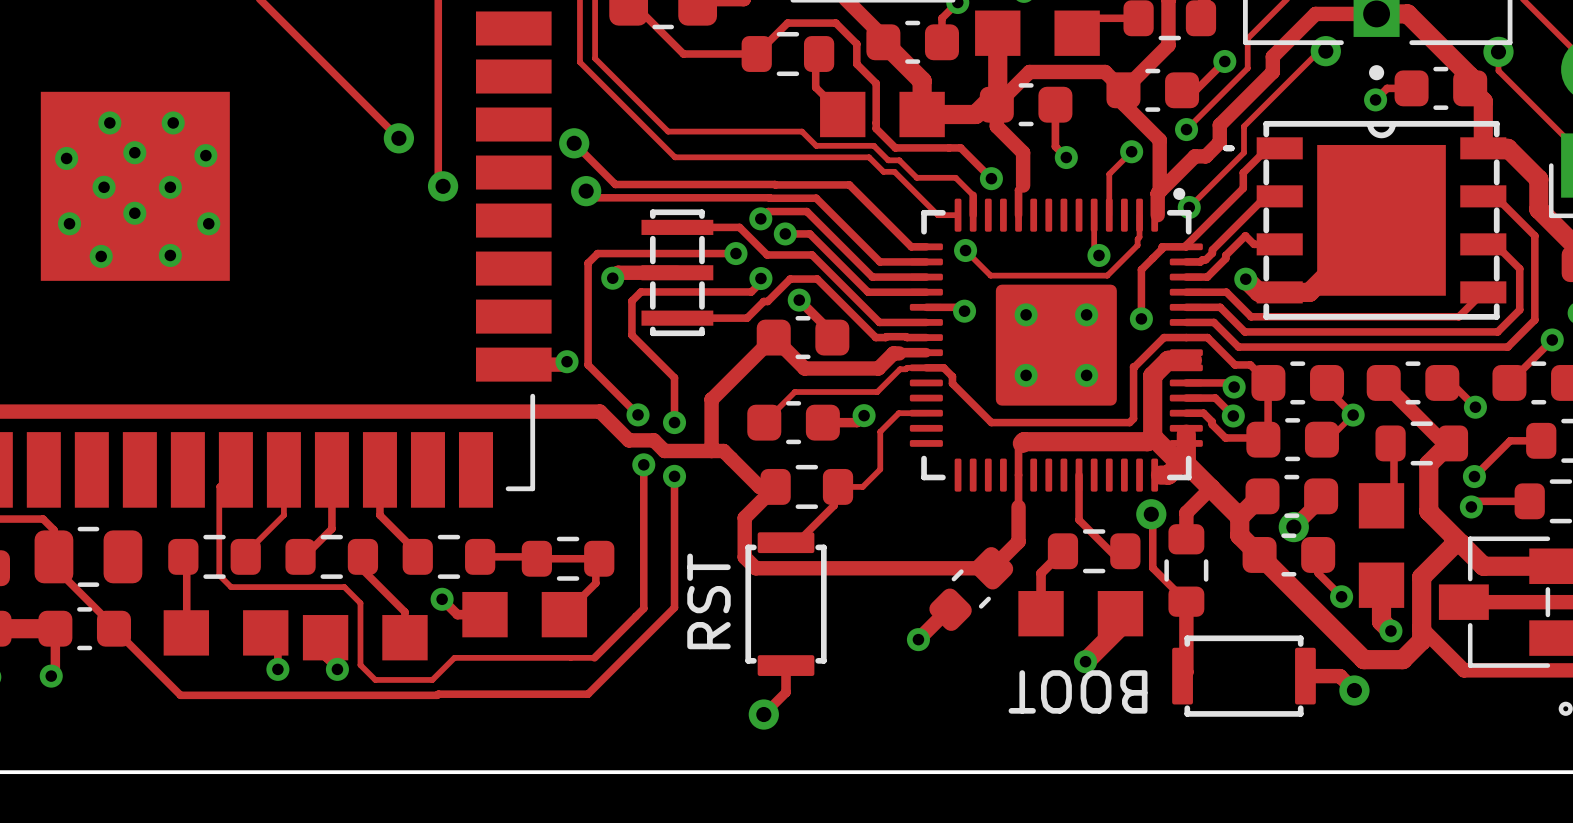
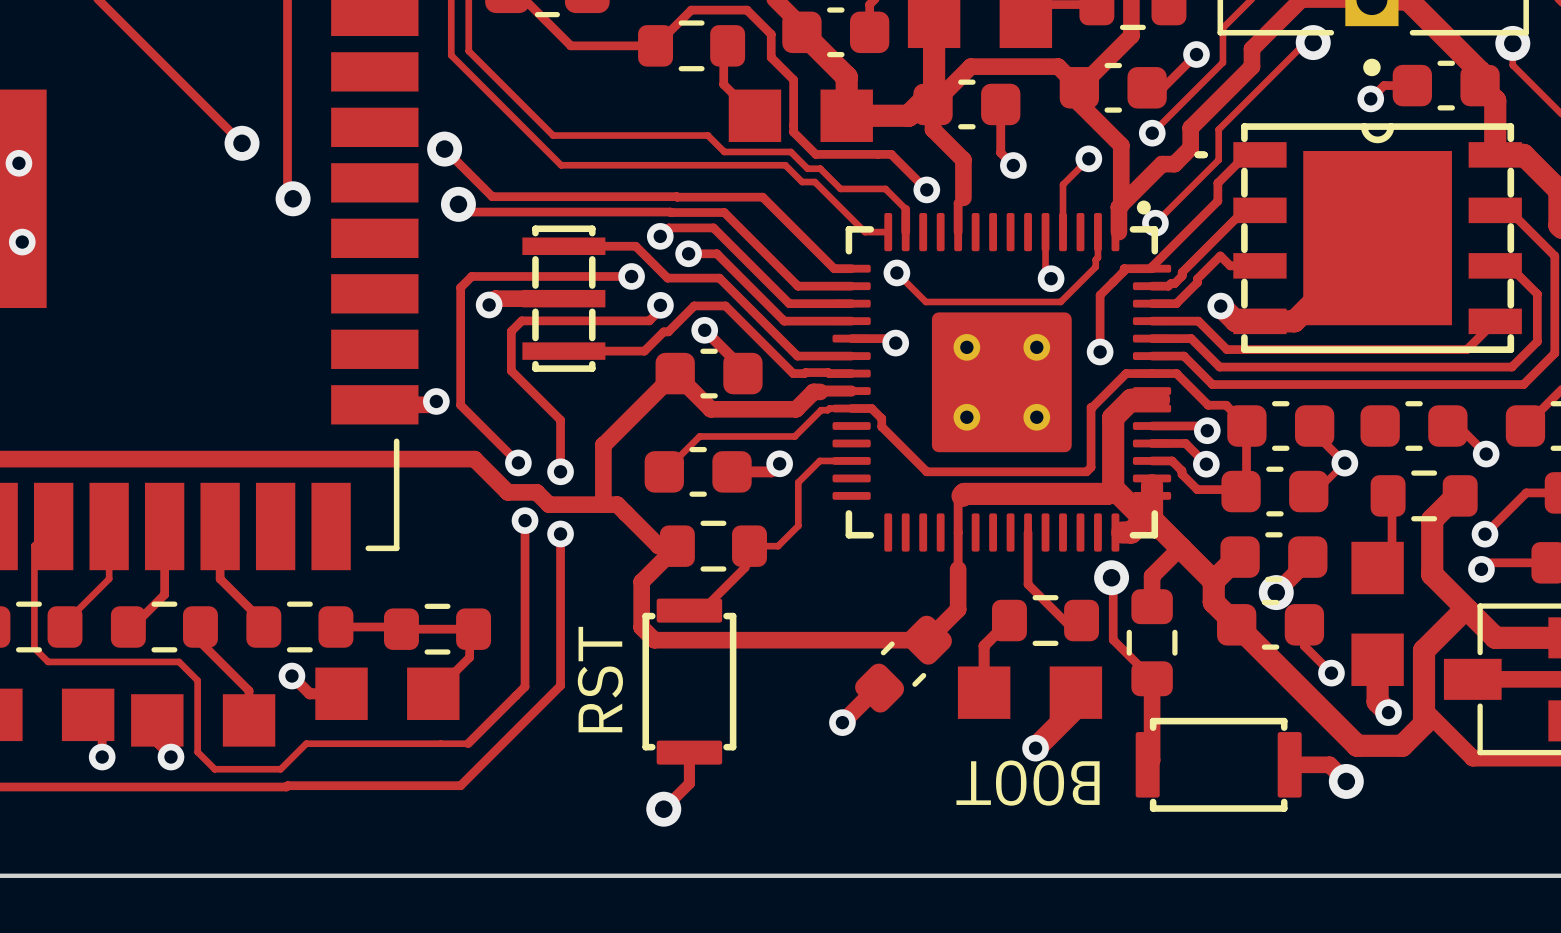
track: (1383, 382) (1444, 443) (1452, 443) -> none

